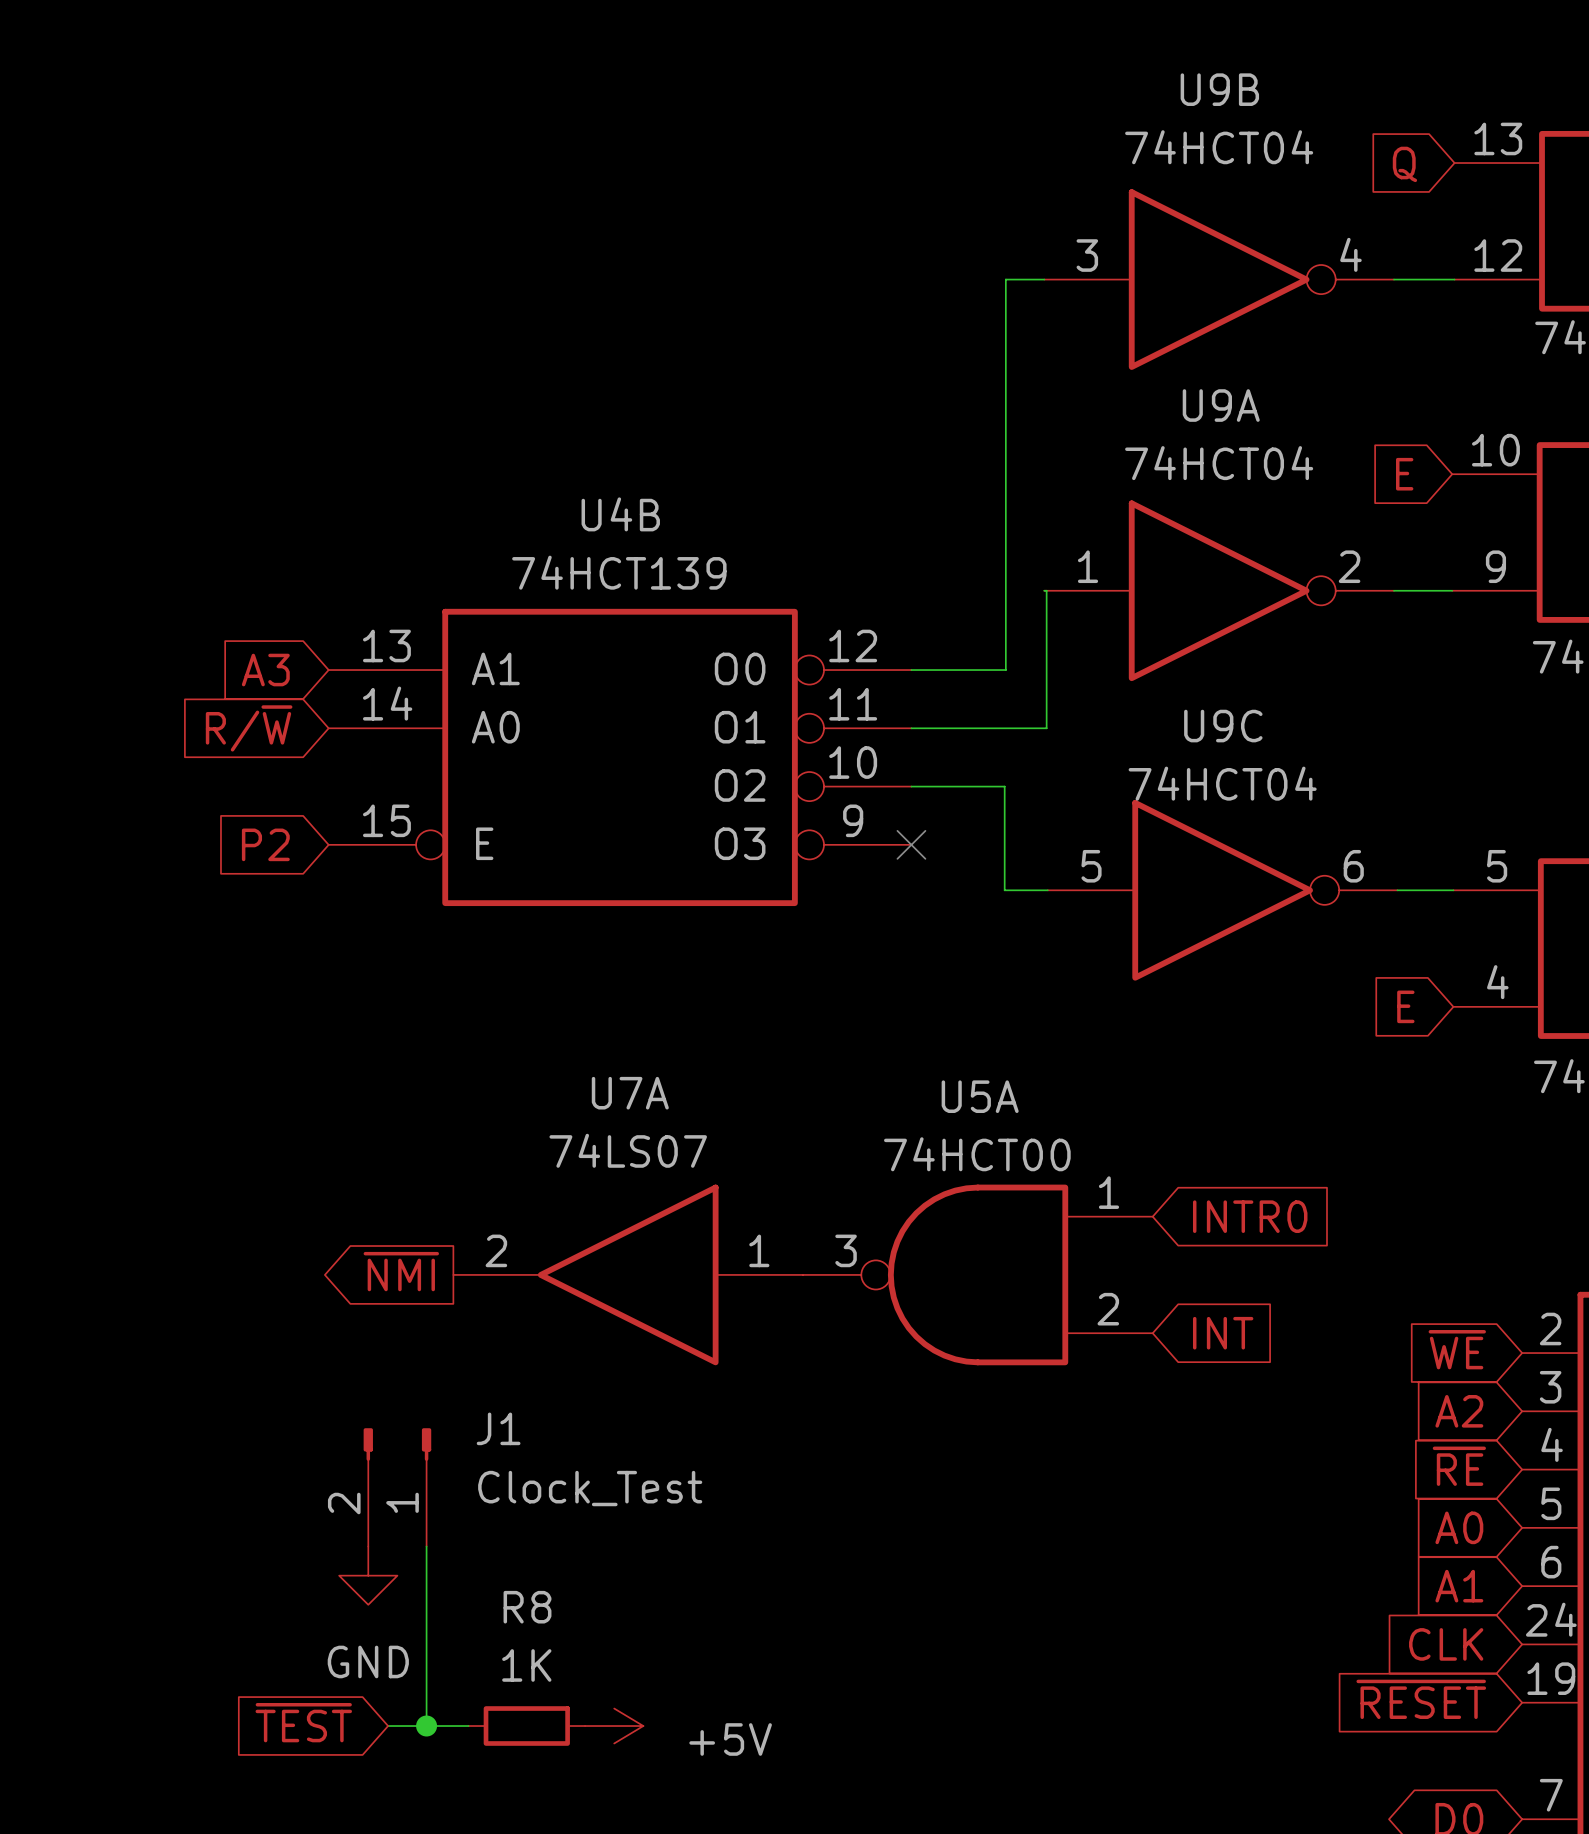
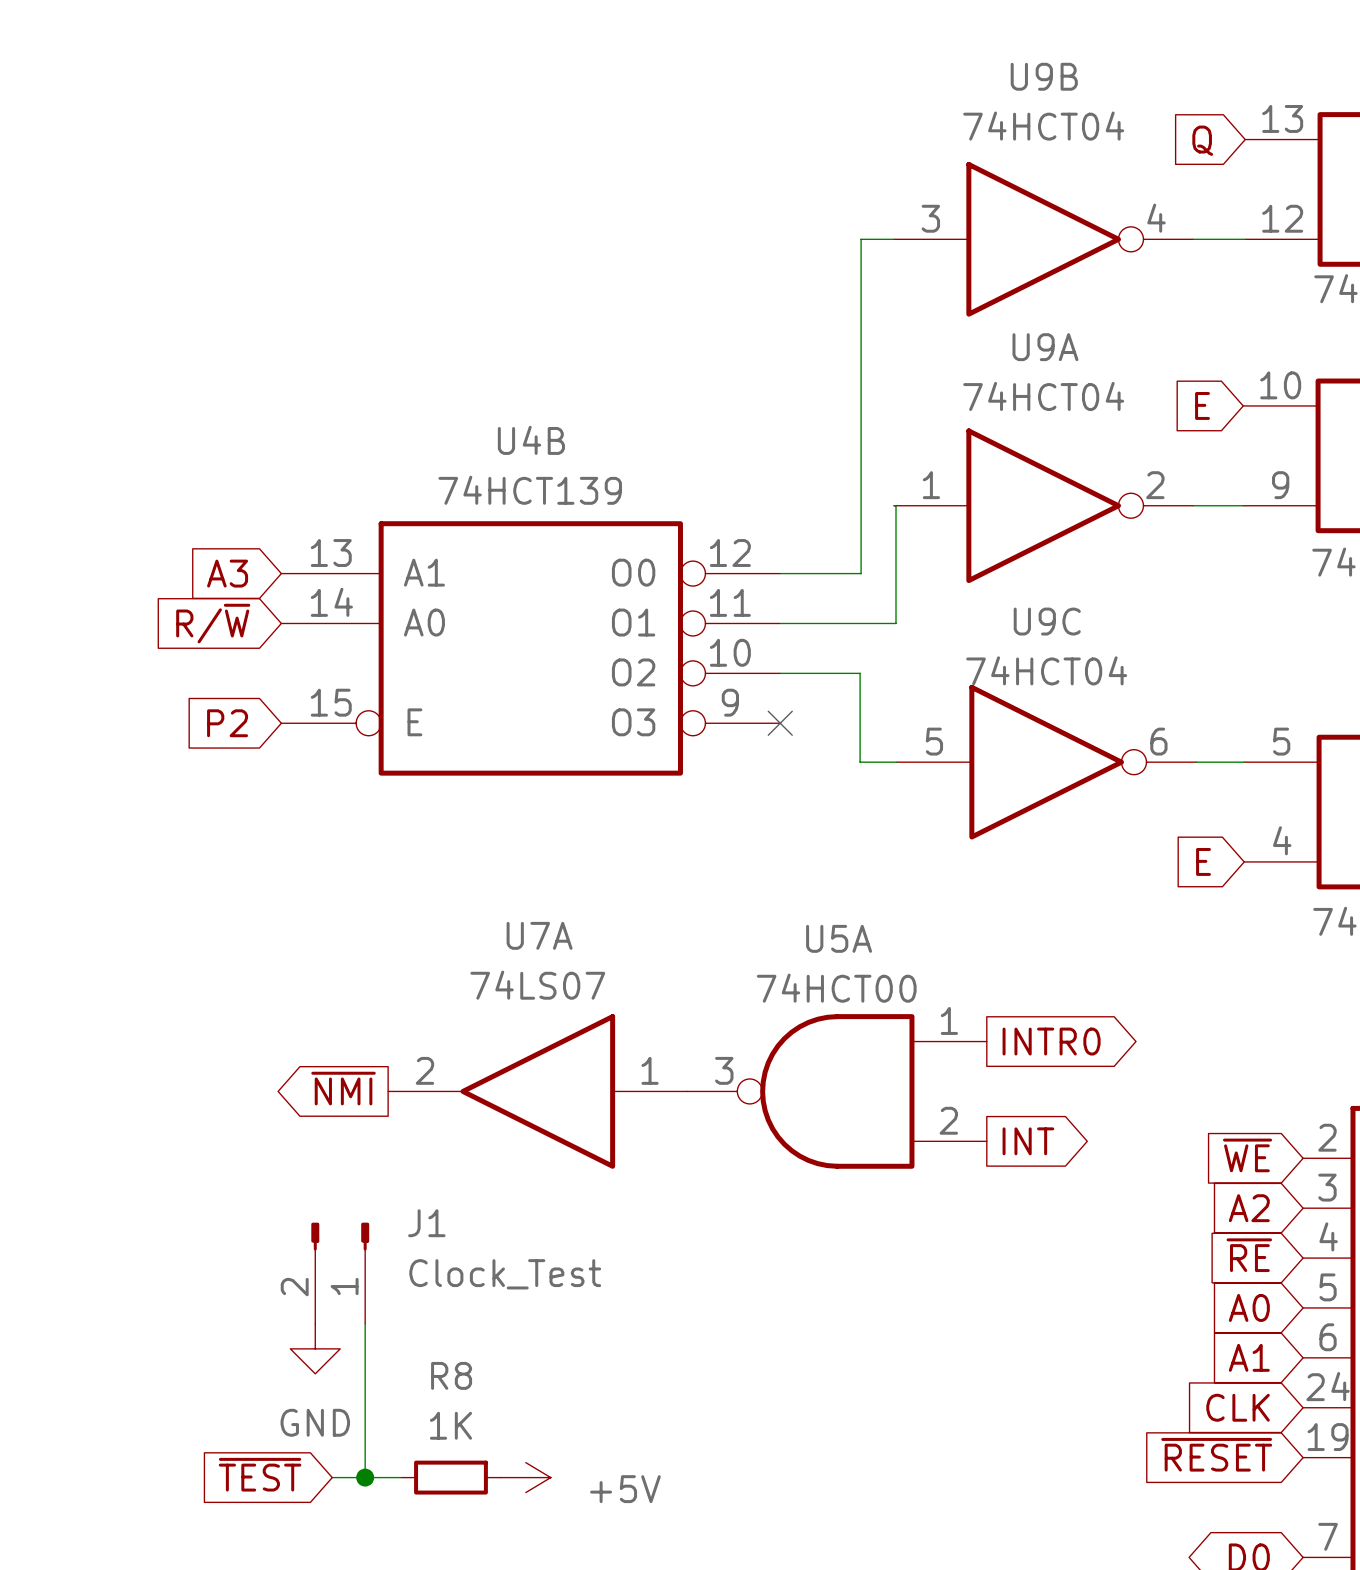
global label shape: input (1250, 1216) -> output (1051, 1041)
global label shape: input (1223, 1333) -> output (1028, 1141)

